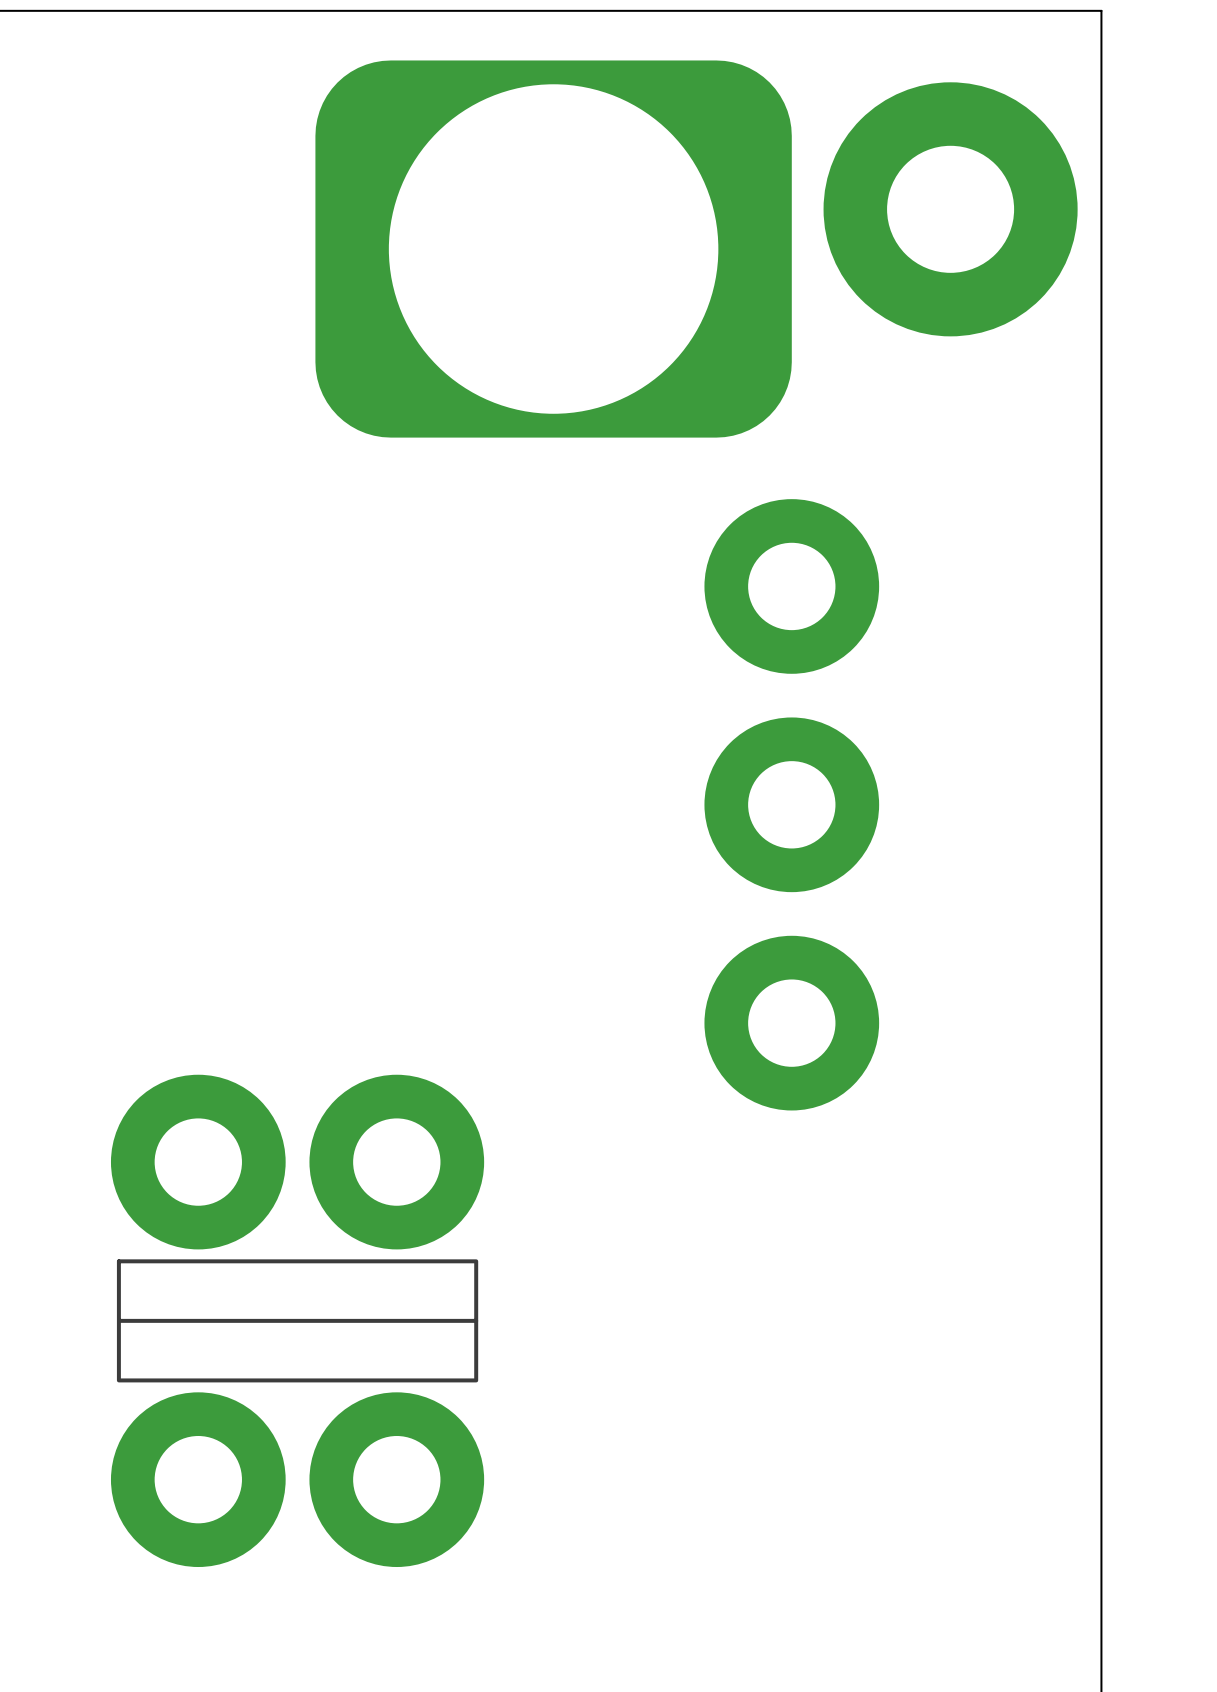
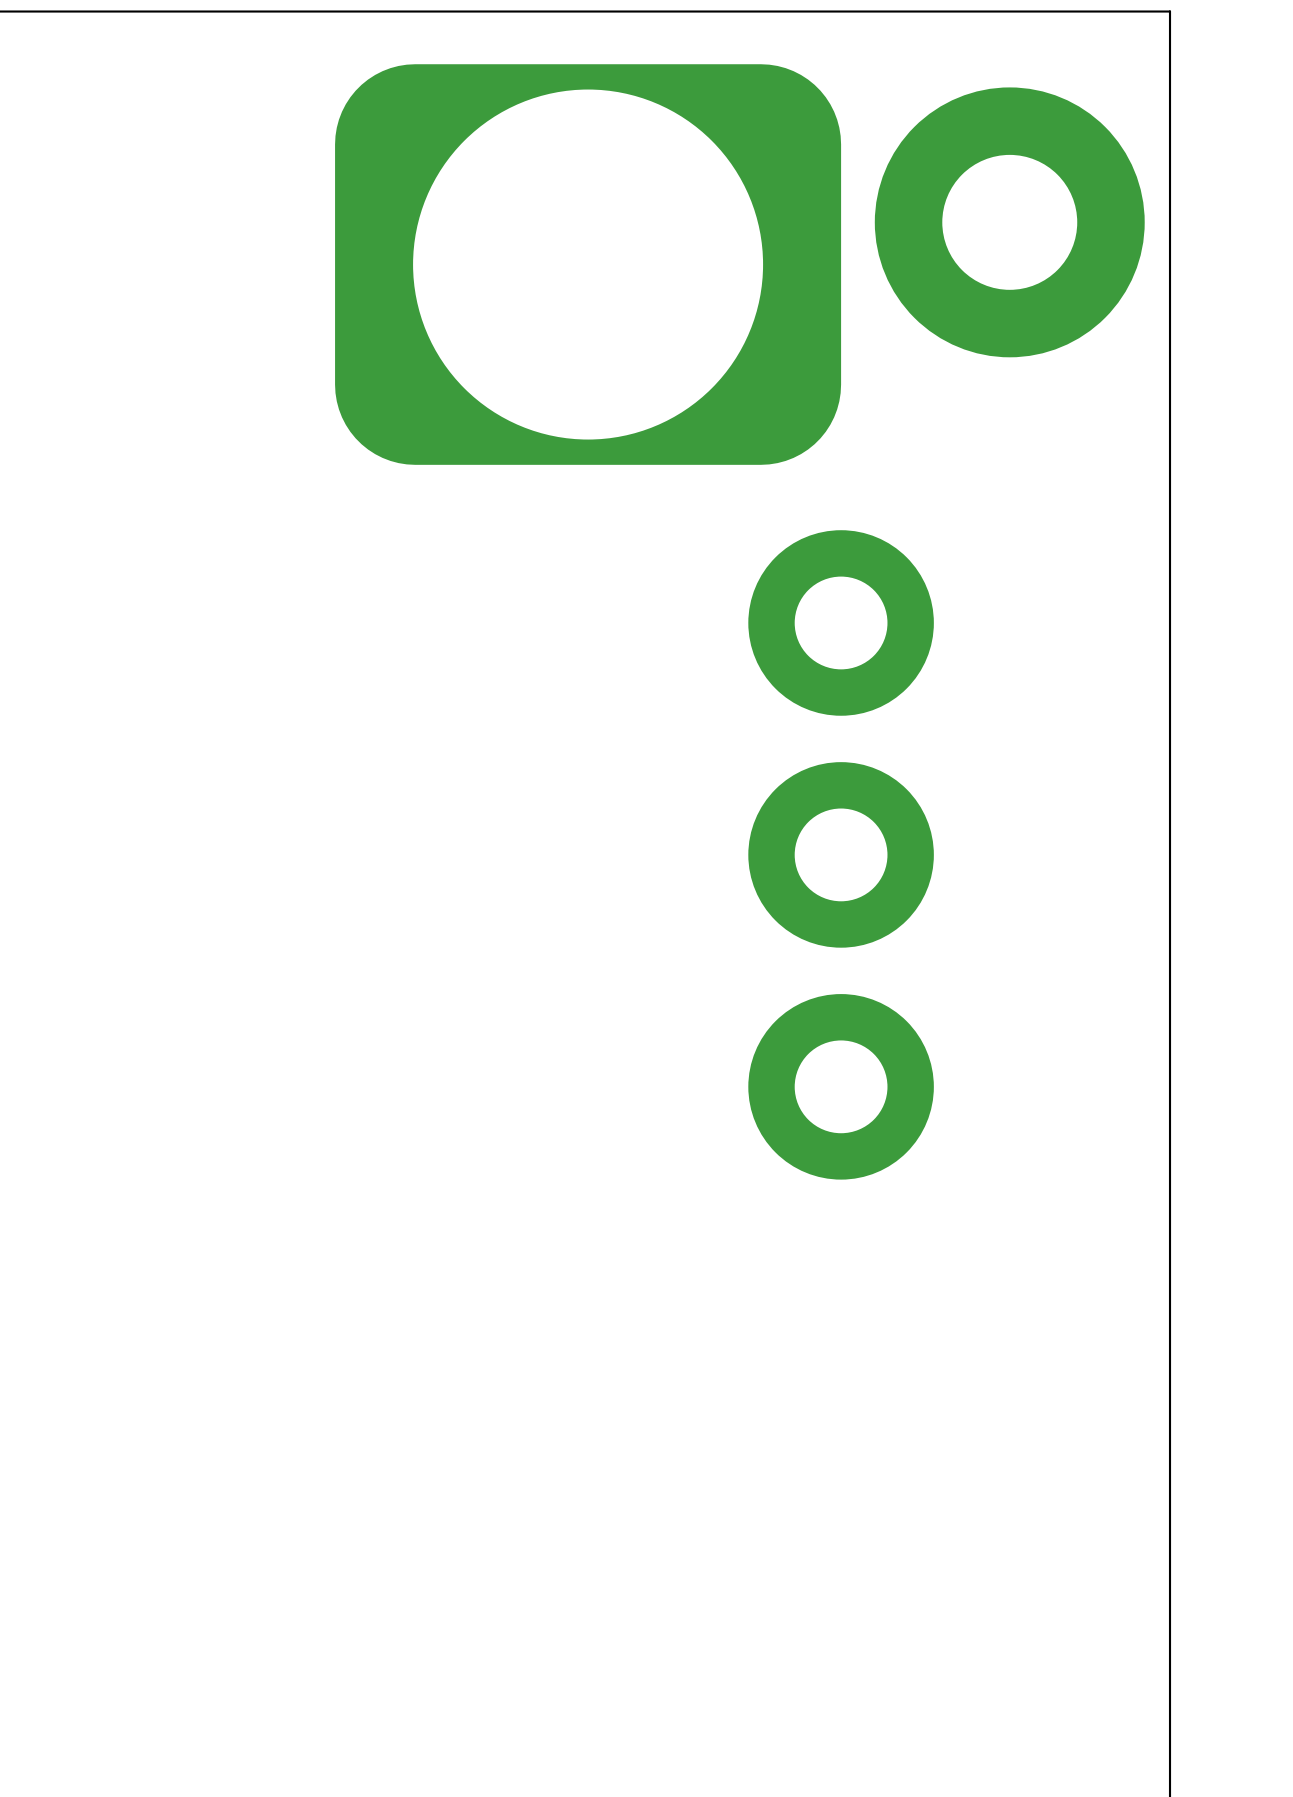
part: (297, 1320) -> none

